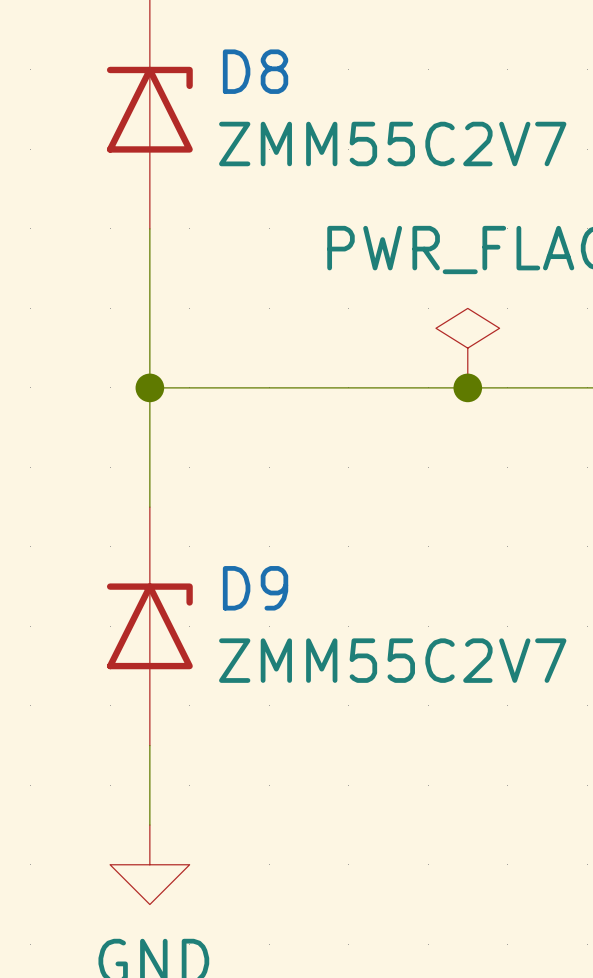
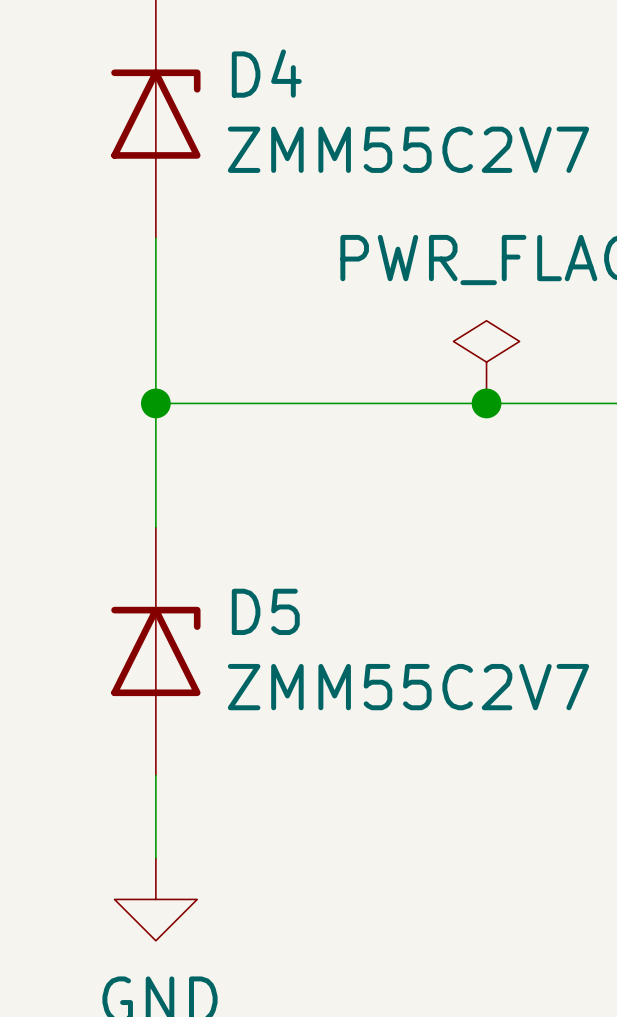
D8 name: D8 (255, 71) -> D4 (266, 73)
D9 name: D9 (255, 588) -> D5 (265, 611)

